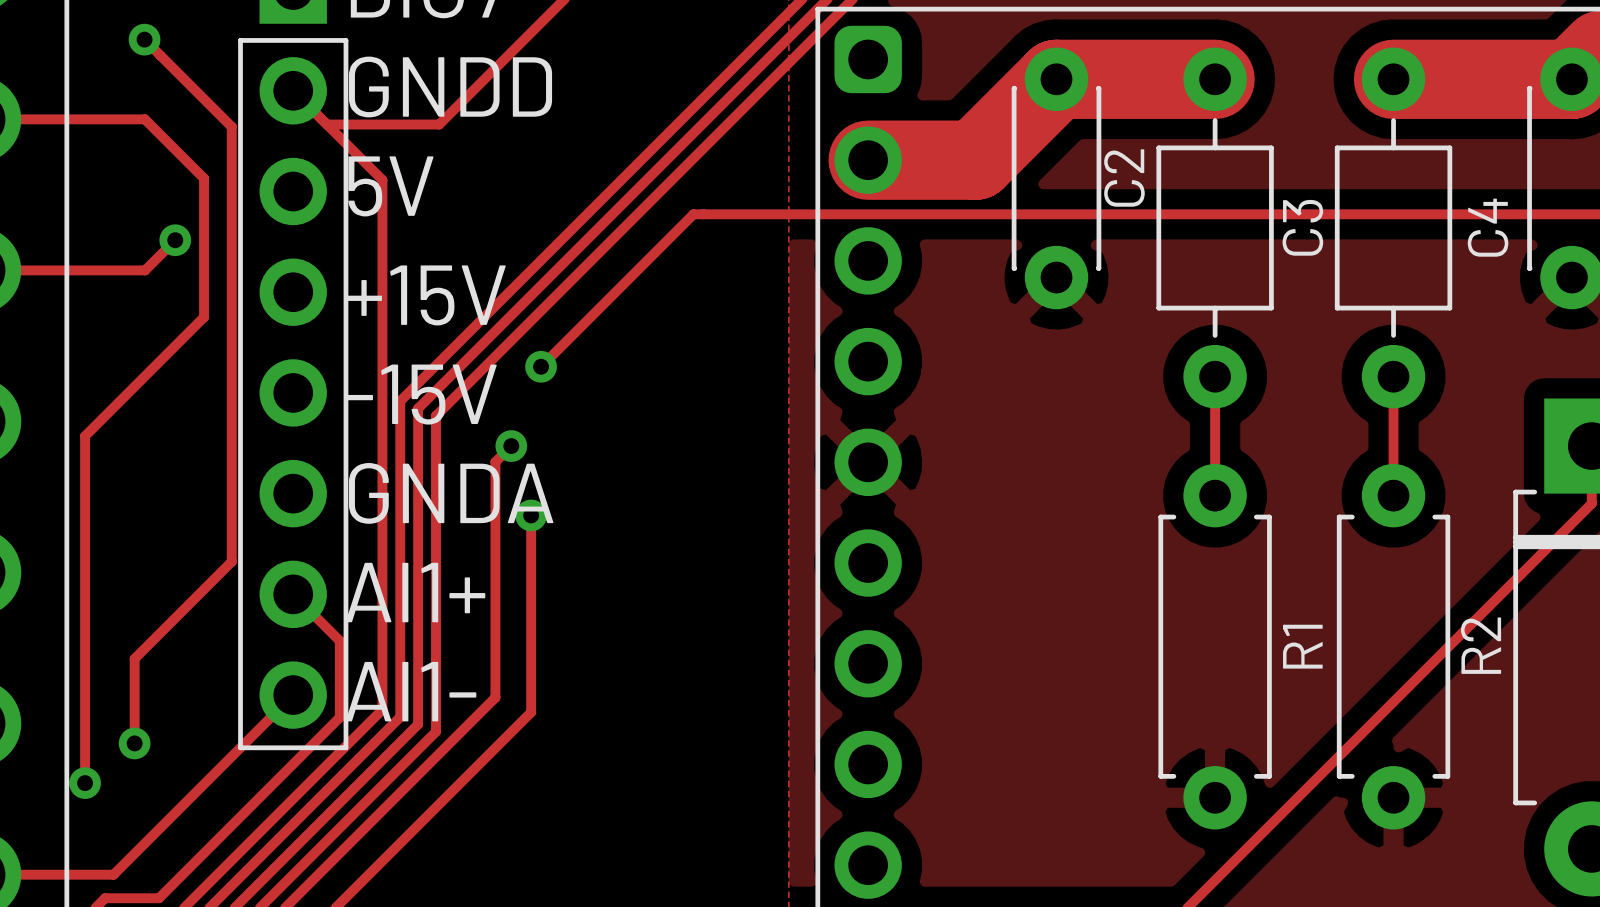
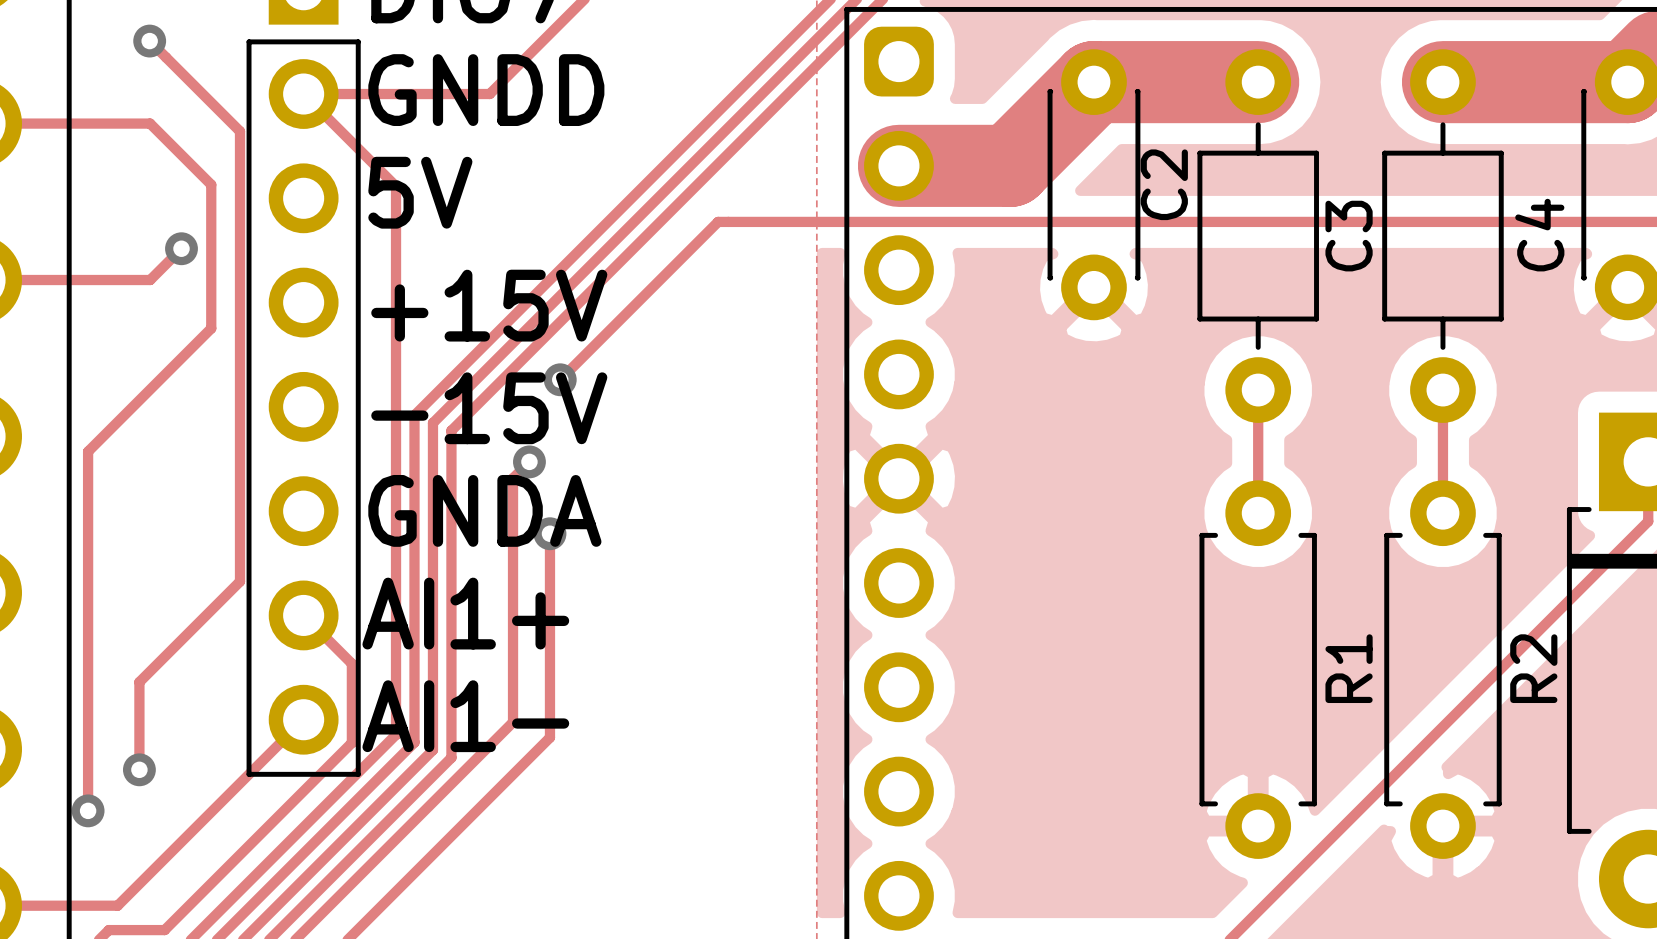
track: (472, 90) (439, 124) (326, 124) -> (489, 94) (303, 94)

